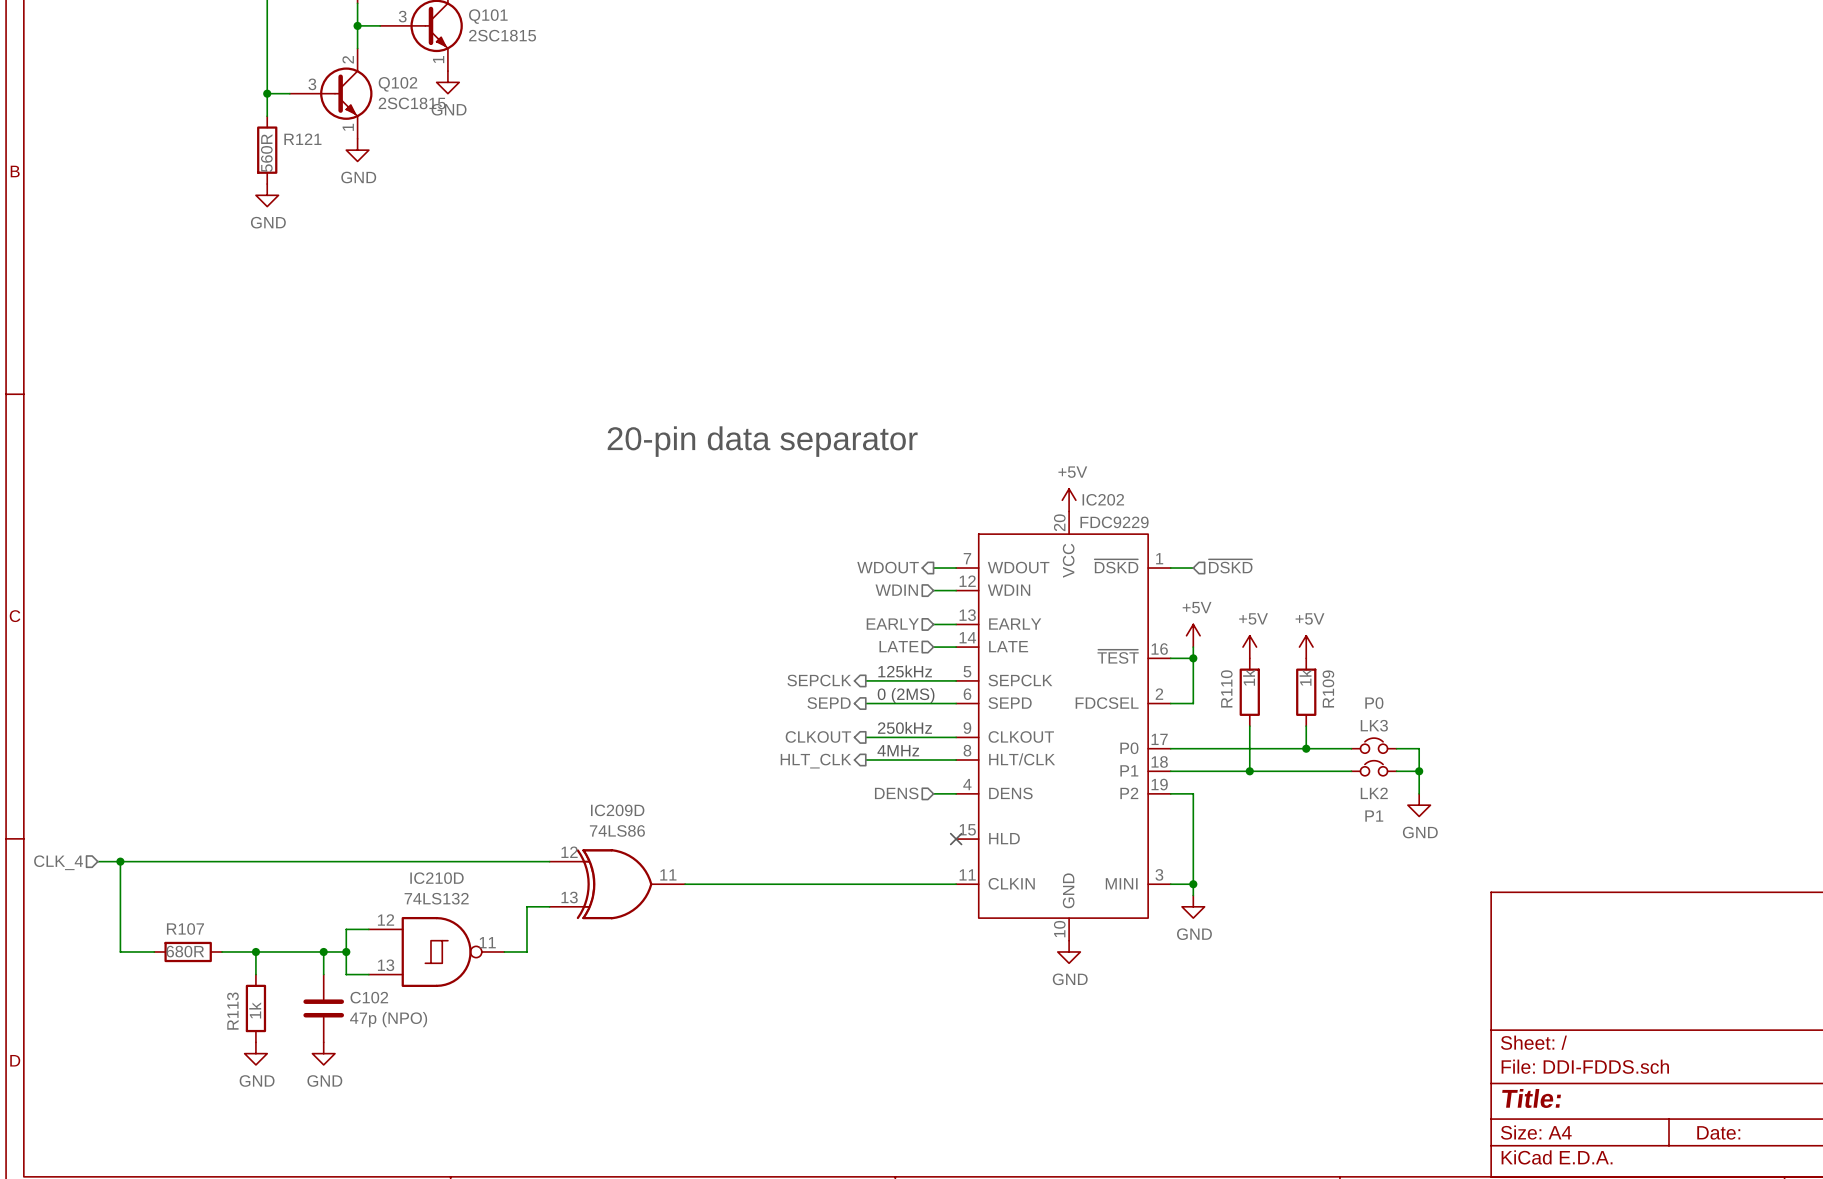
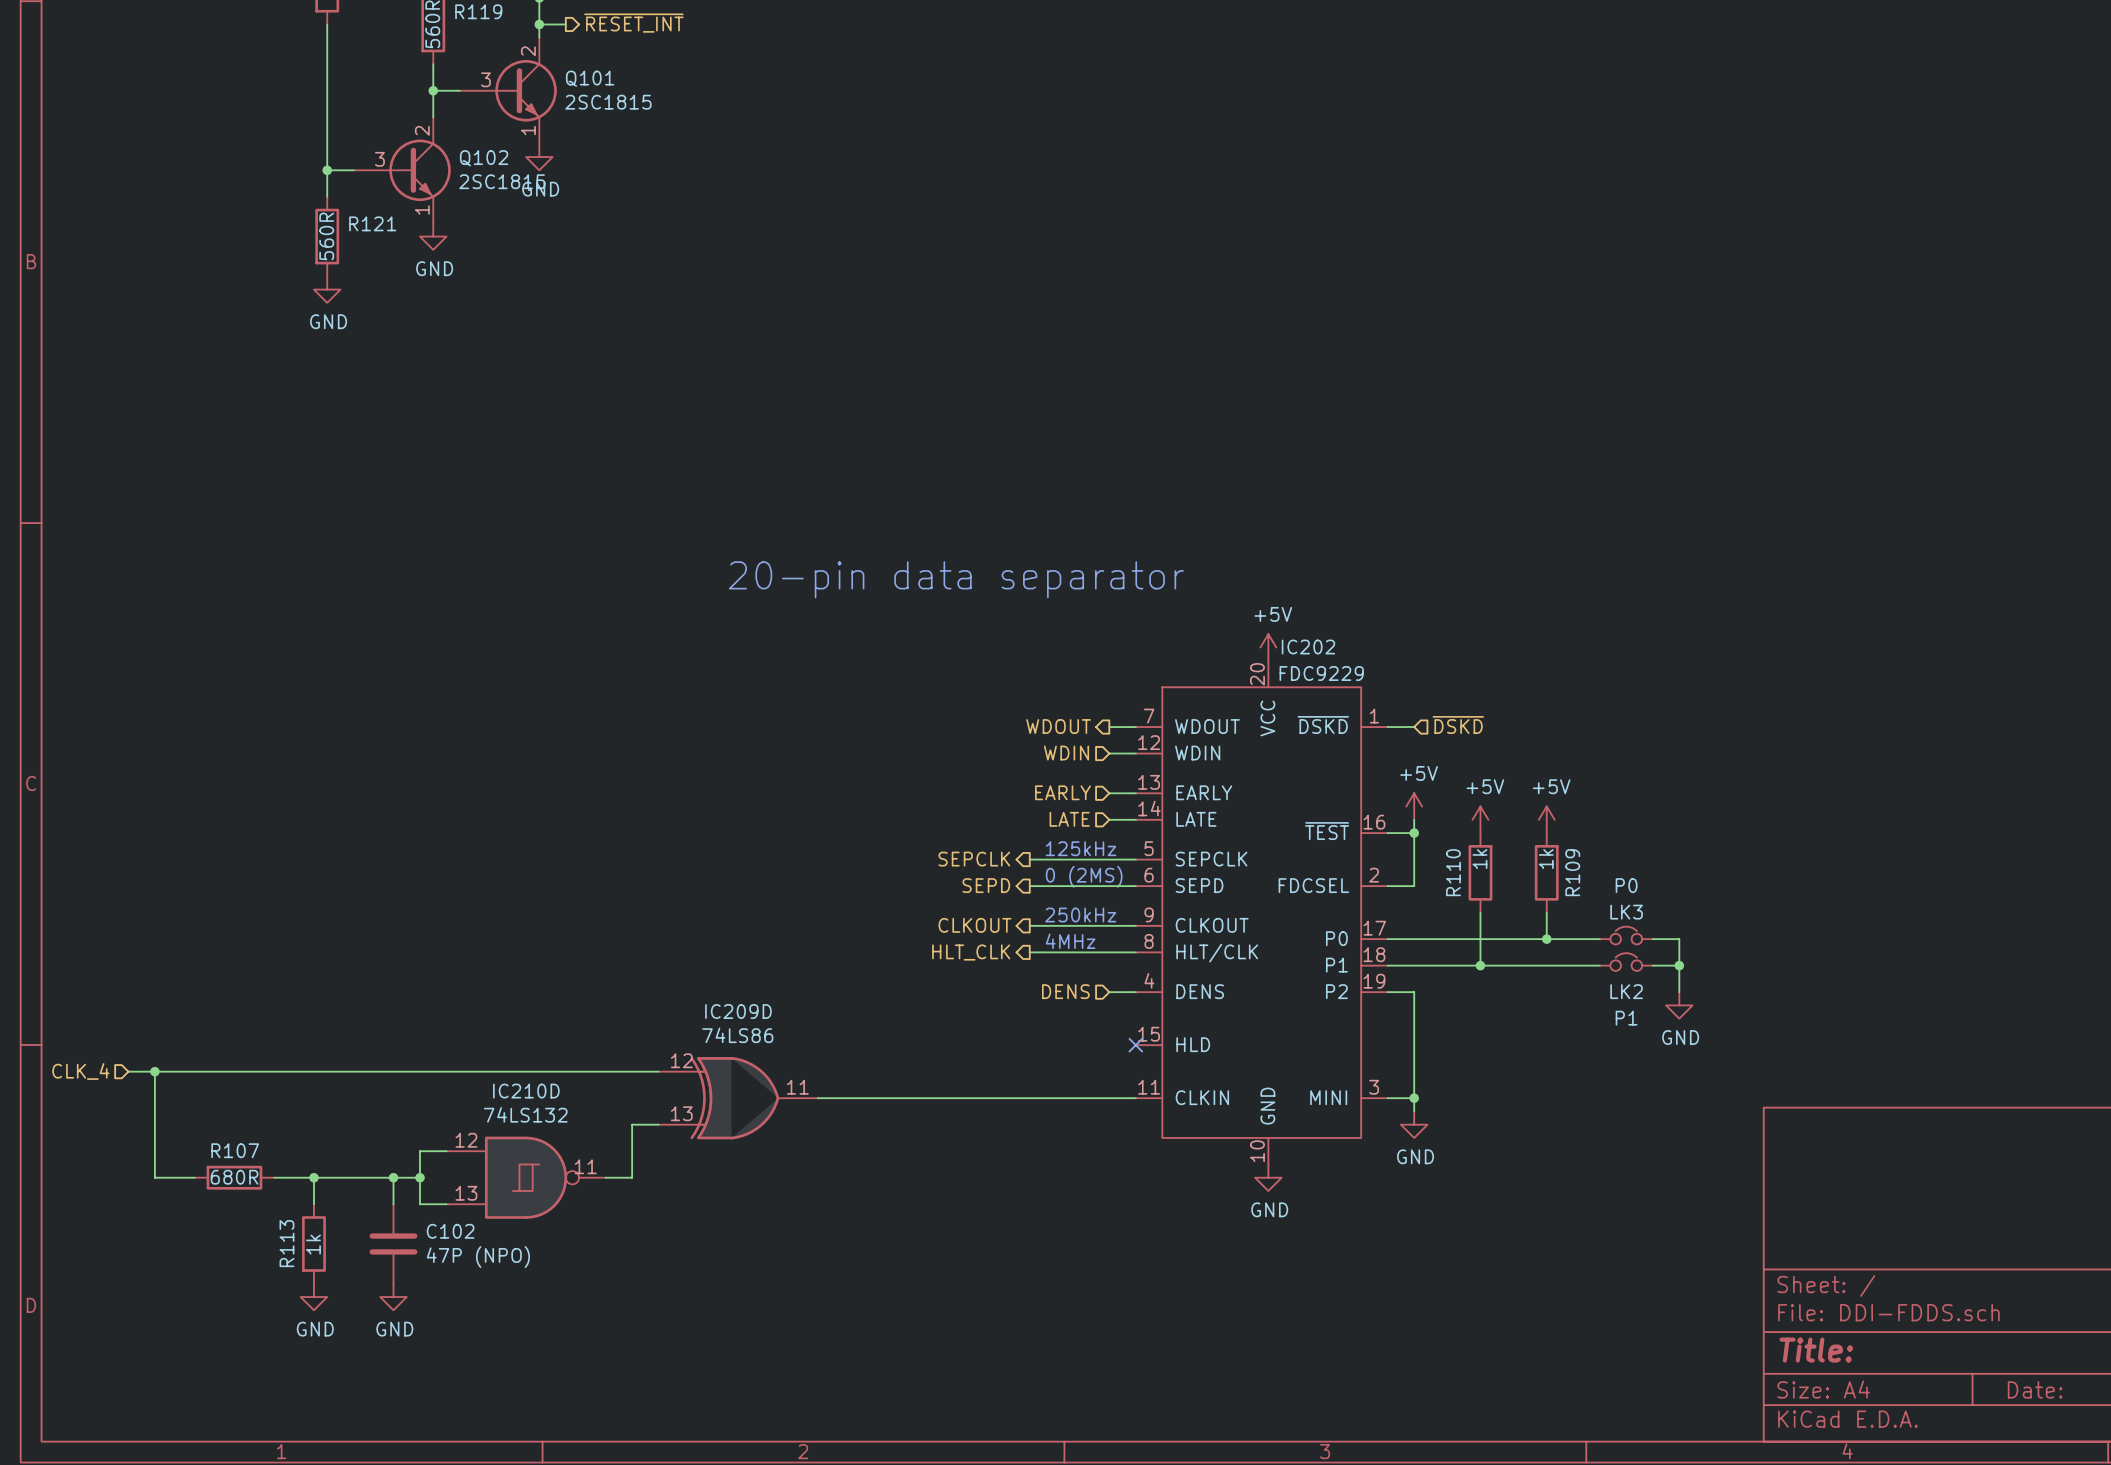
C102 value: 47p (NPO) (388, 1019) -> 47P (NPO) (478, 1257)

